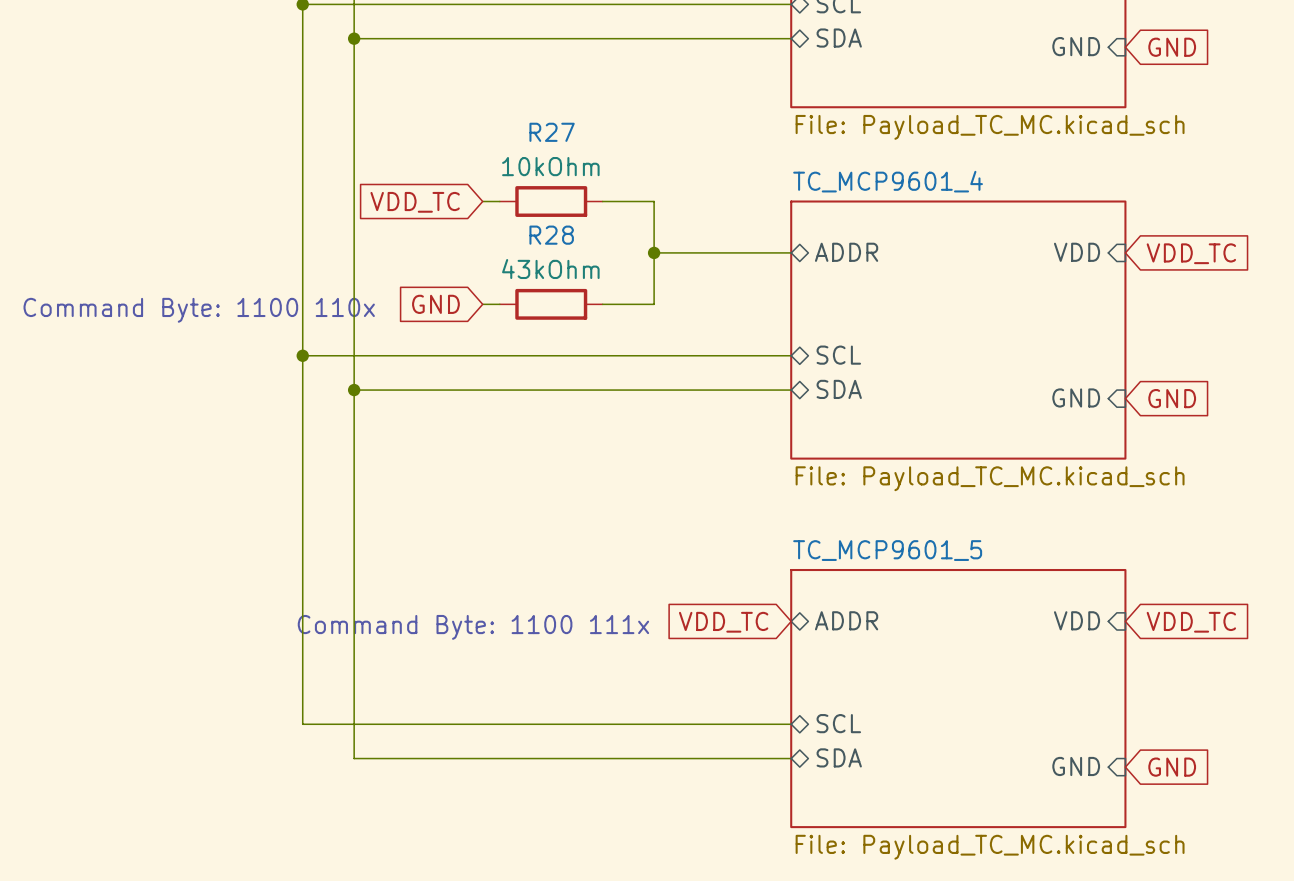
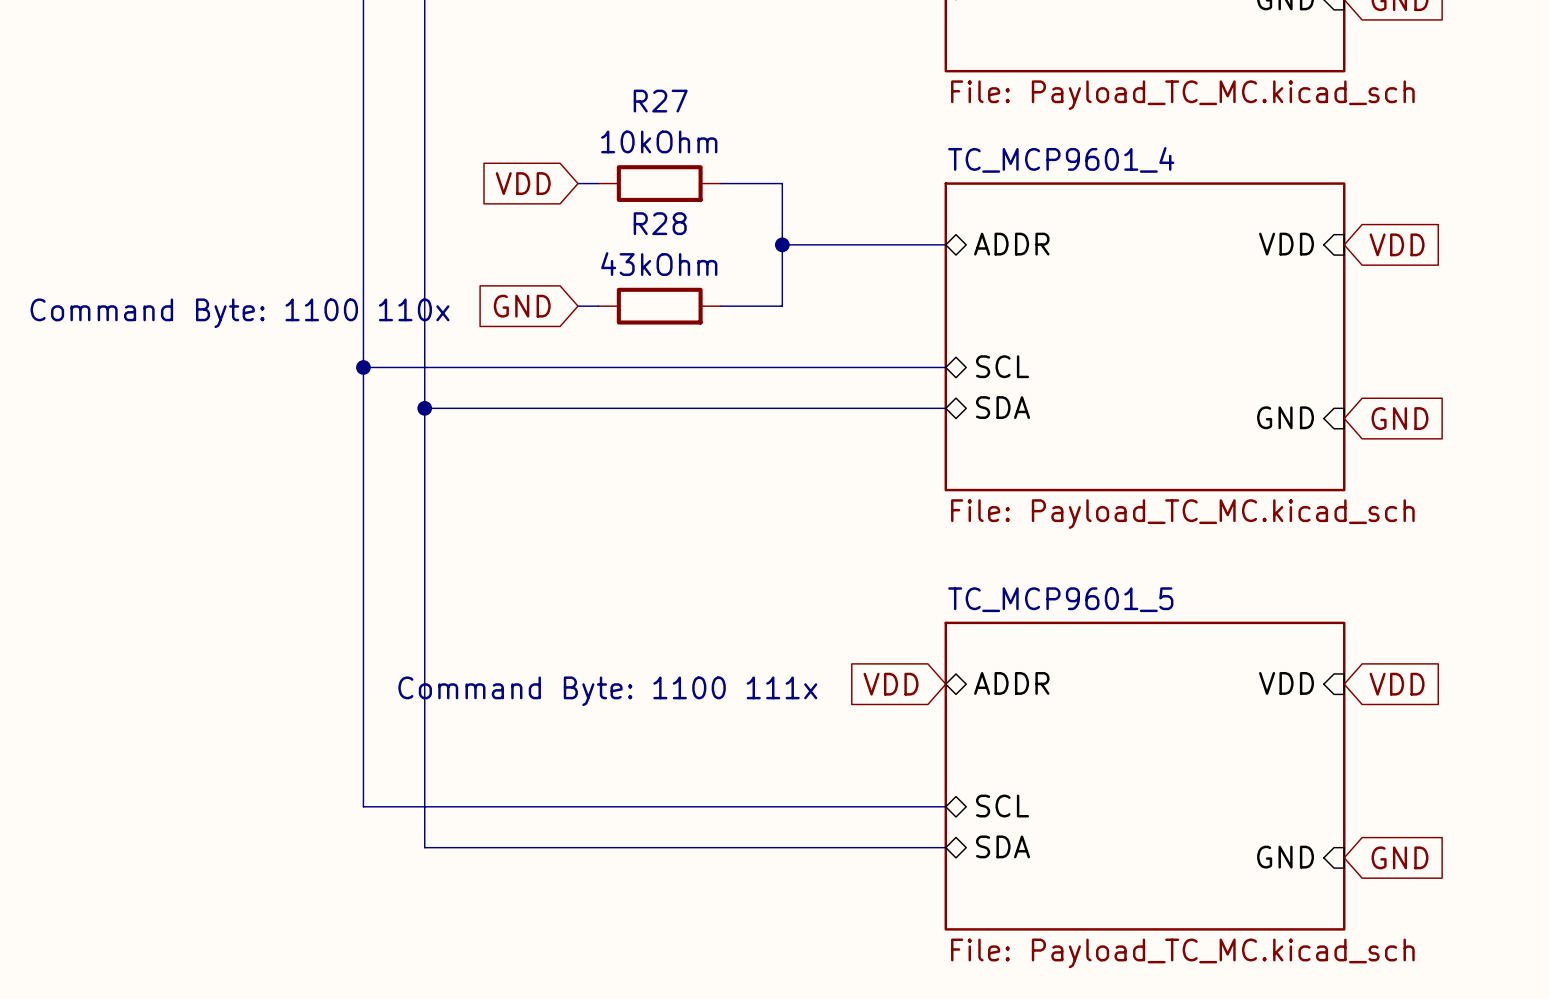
global label: VDD_TC (415, 202) -> VDD (523, 183)
global label: VDD_TC (1191, 253) -> VDD (1397, 244)
global label: VDD_TC (723, 622) -> VDD (891, 684)
global label: VDD_TC (1191, 622) -> VDD (1397, 684)
text position: Command Byte: 1100 111x (473, 627) -> Command Byte: 1100 111x (607, 691)

